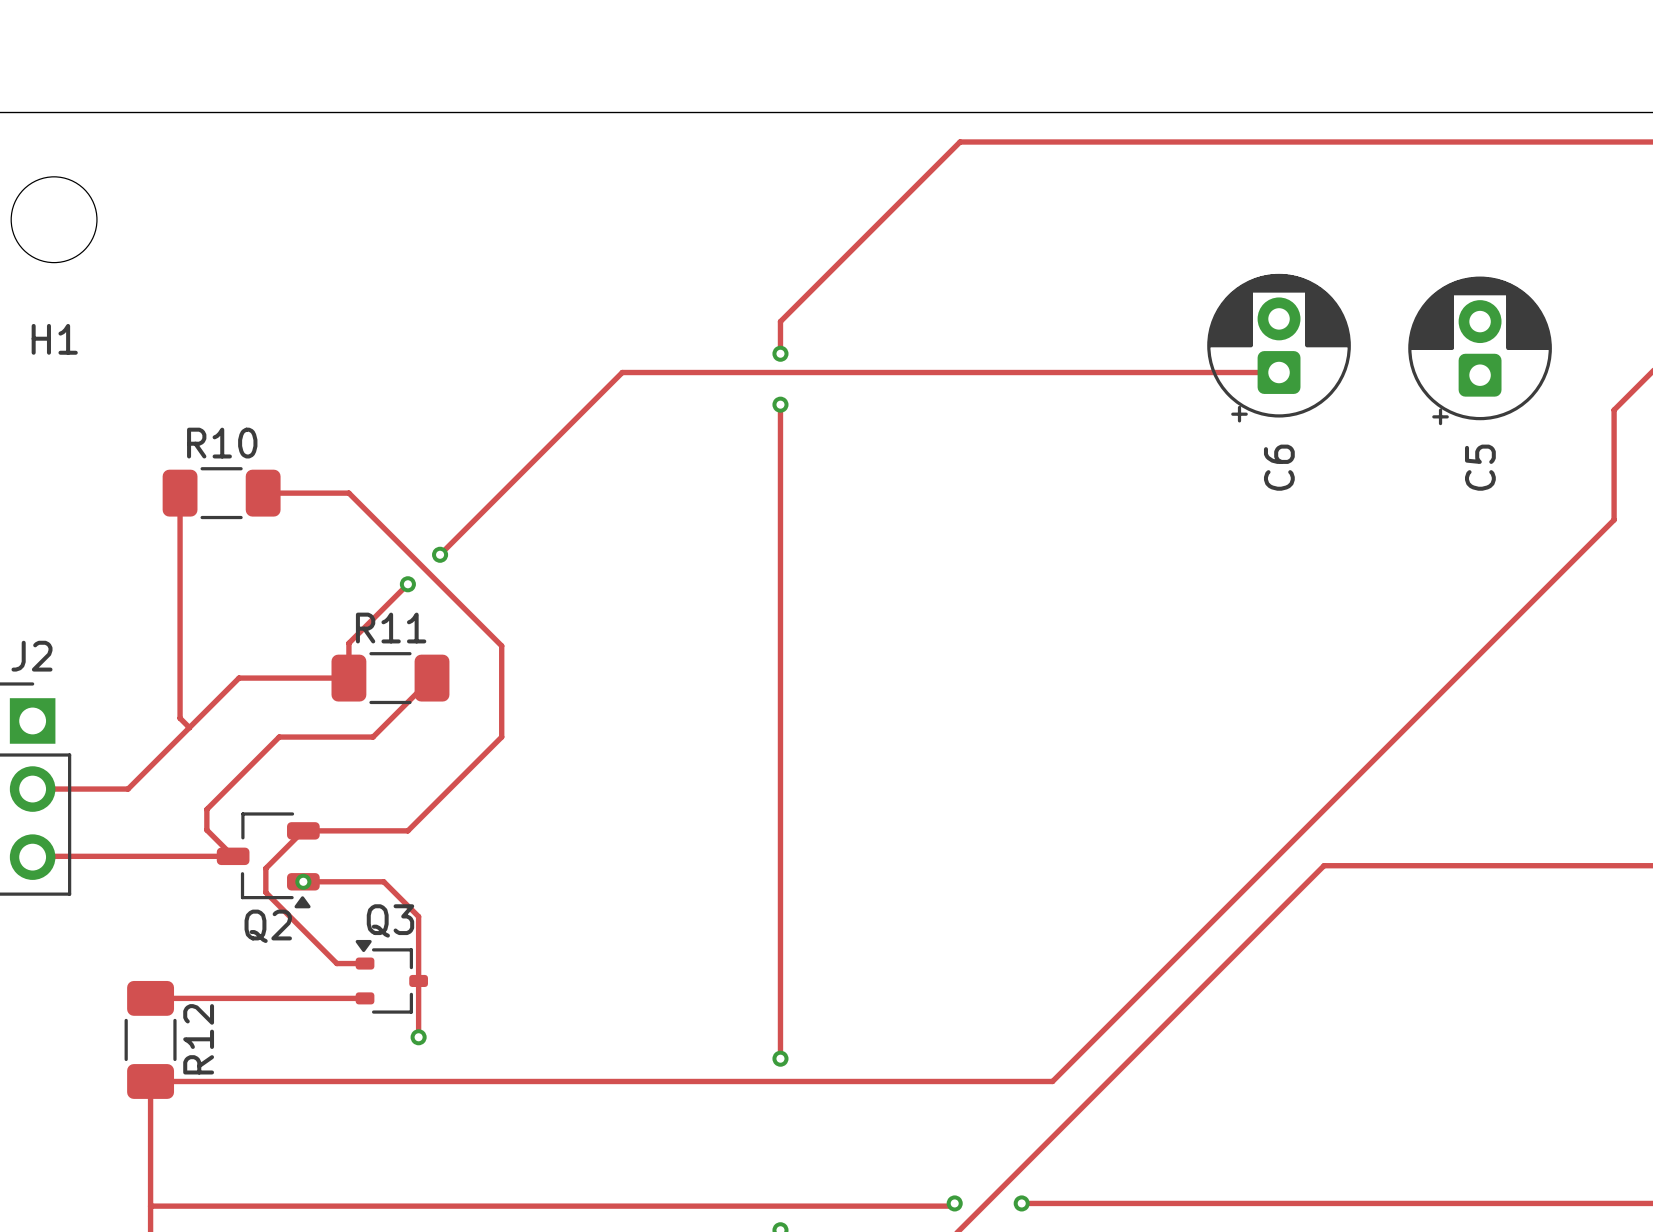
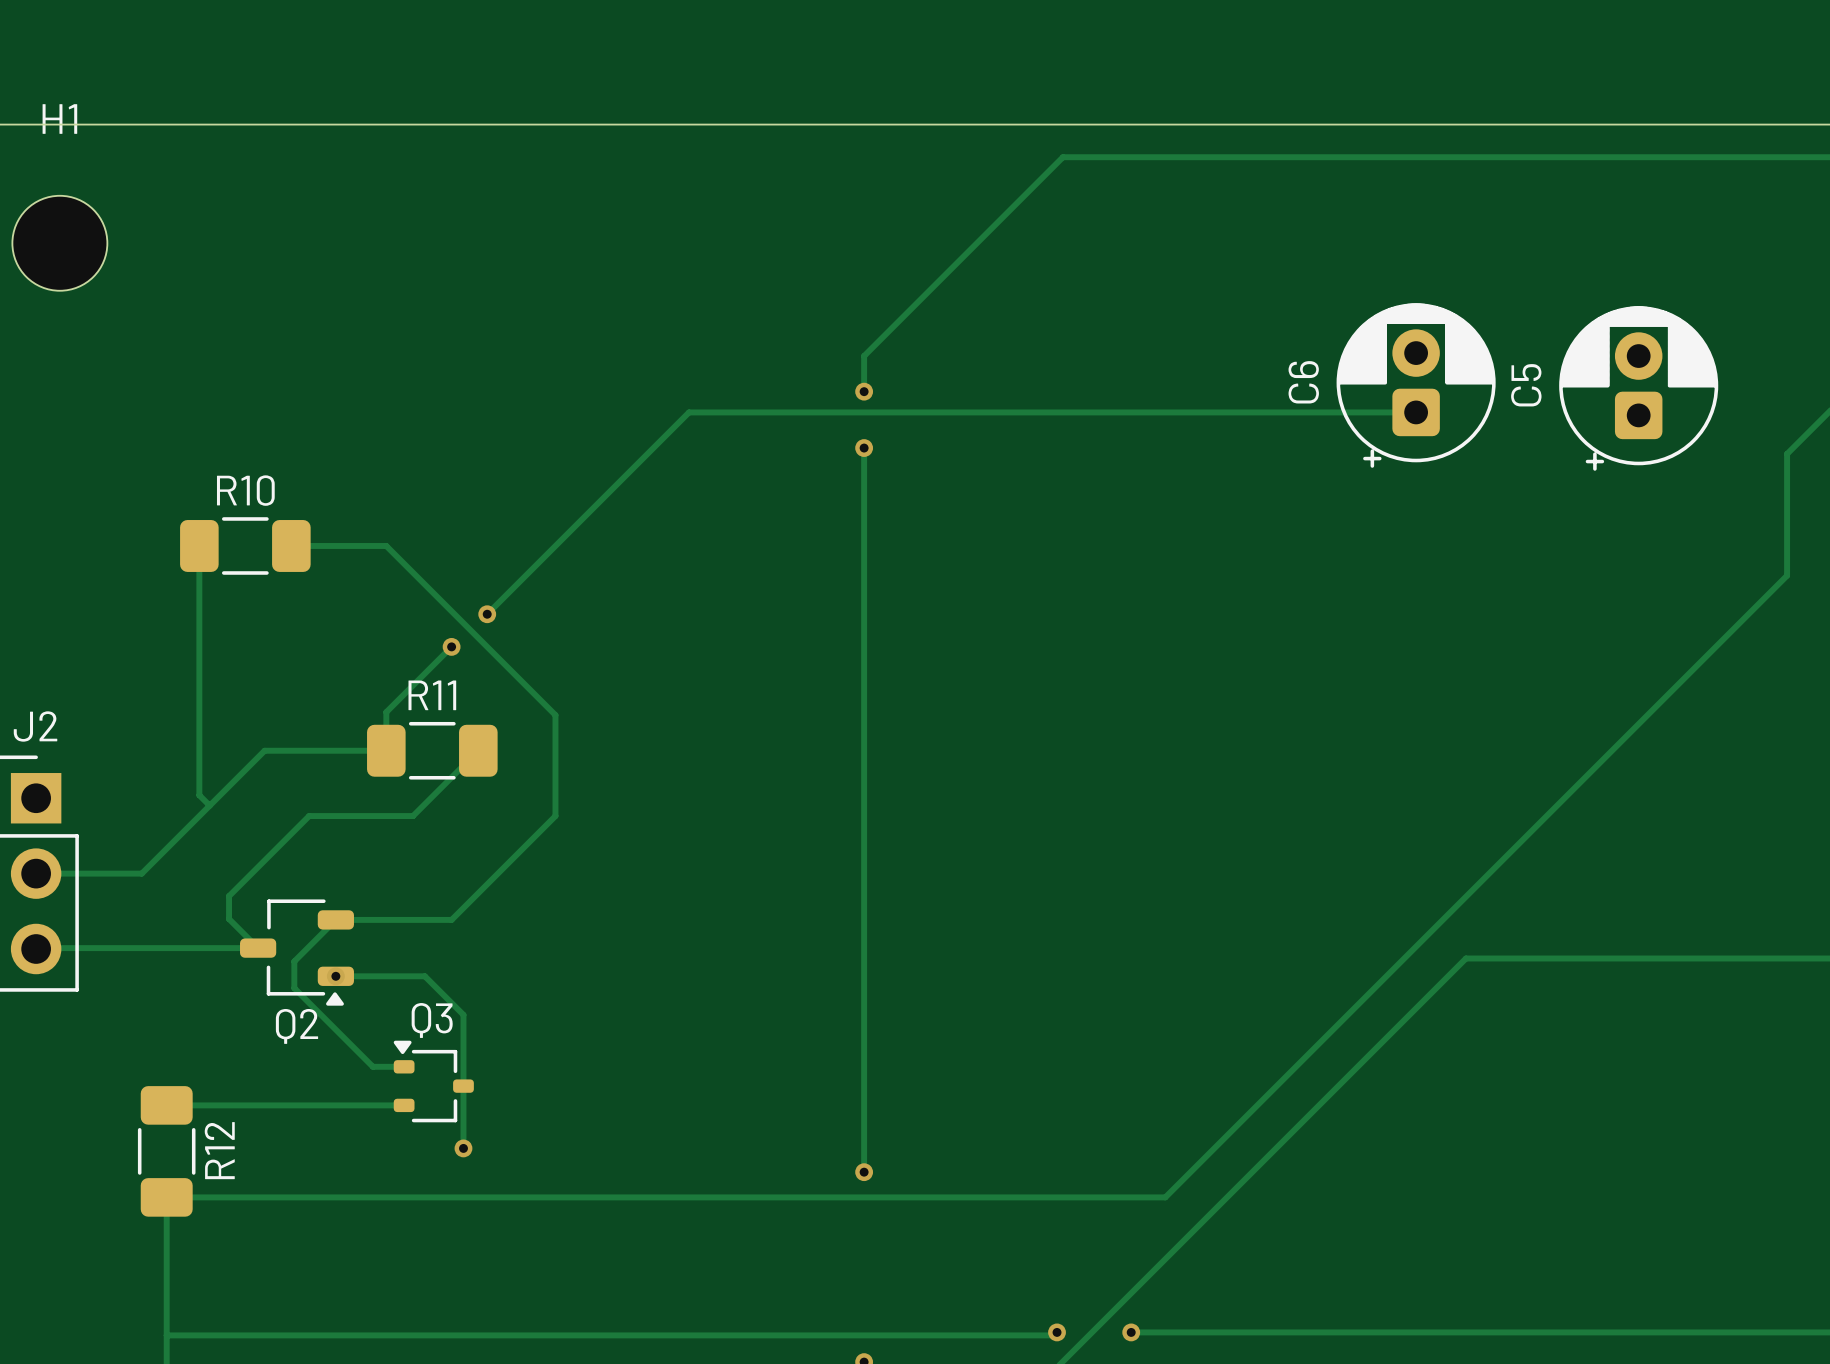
H1 name position: H1 (54, 339) -> H1 (59, 119)
C6 name position: C6 (1279, 467) -> C6 (1303, 382)
C5 name position: C5 (1480, 467) -> C5 (1526, 385)

